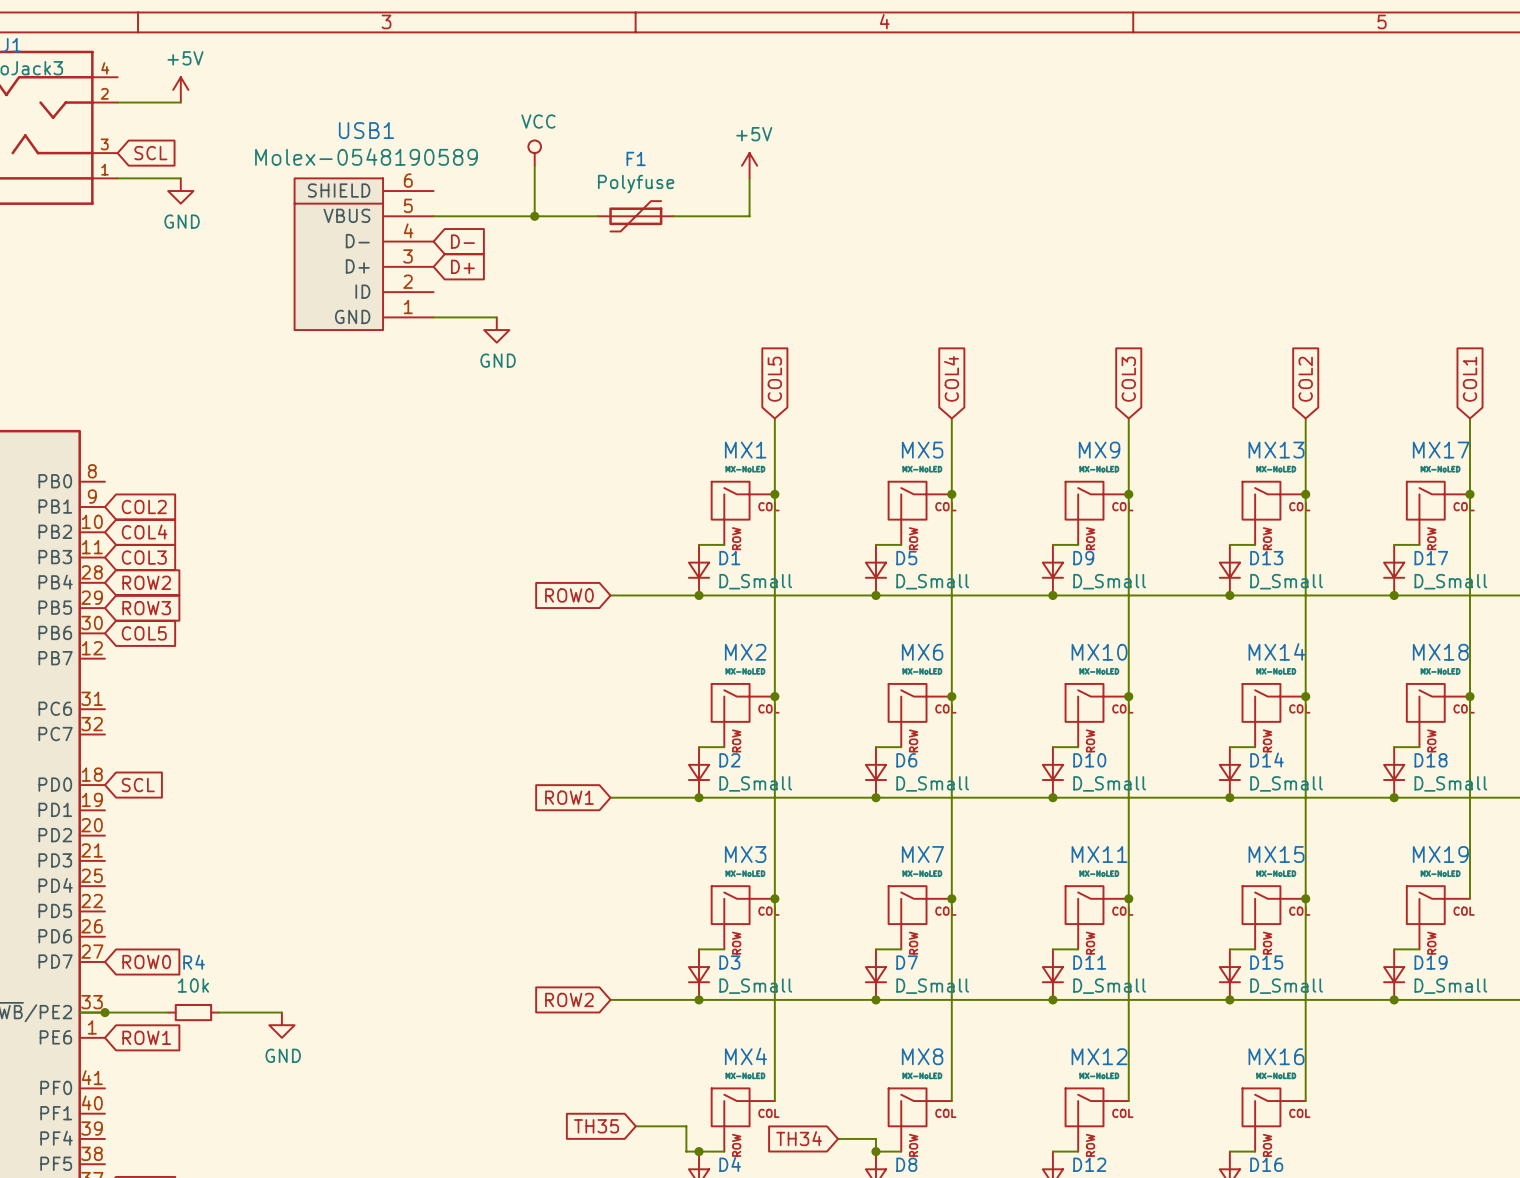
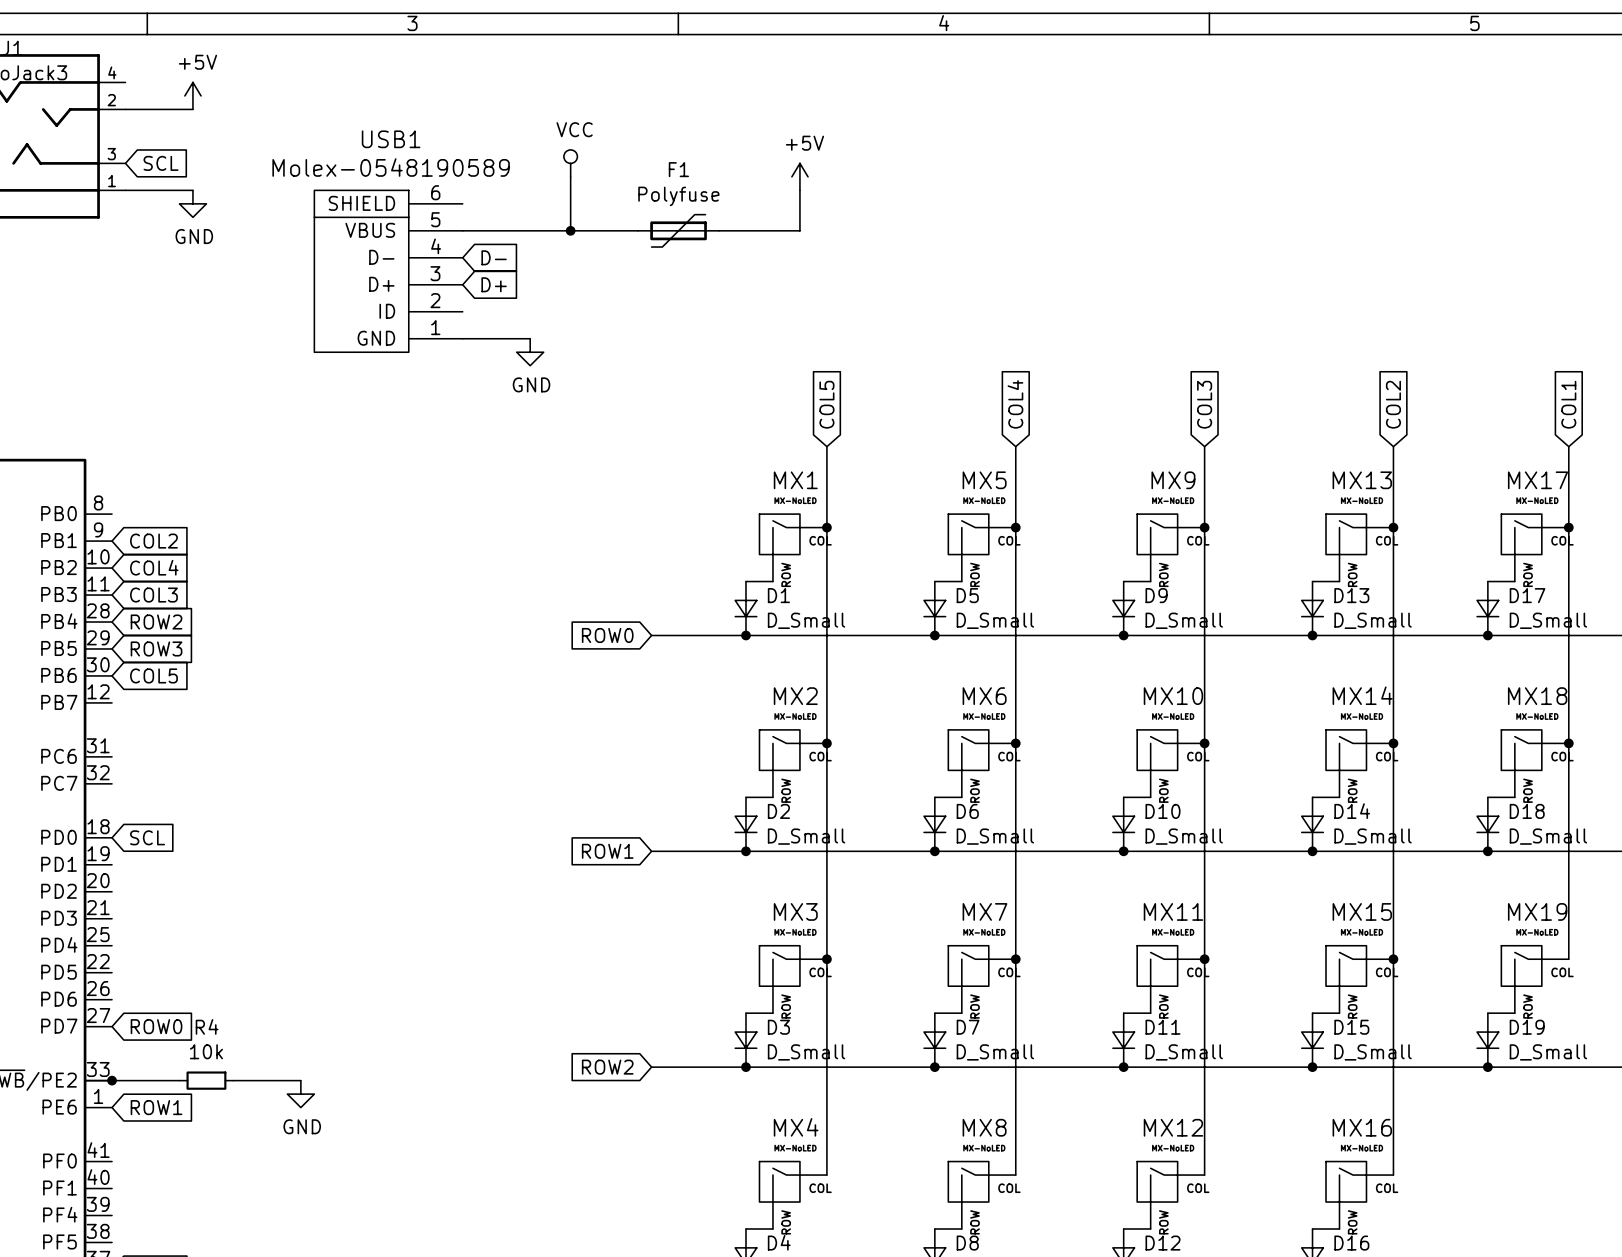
global label: TH35 (596, 1126) -> none
wire: (635, 1126) (686, 1126) (686, 1151) (699, 1151) -> none
global label: TH34 (799, 1138) -> none
wire: (838, 1138) (875, 1138) (875, 1151) -> none
junction: (699, 1151) -> none
junction: (875, 1151) -> none

